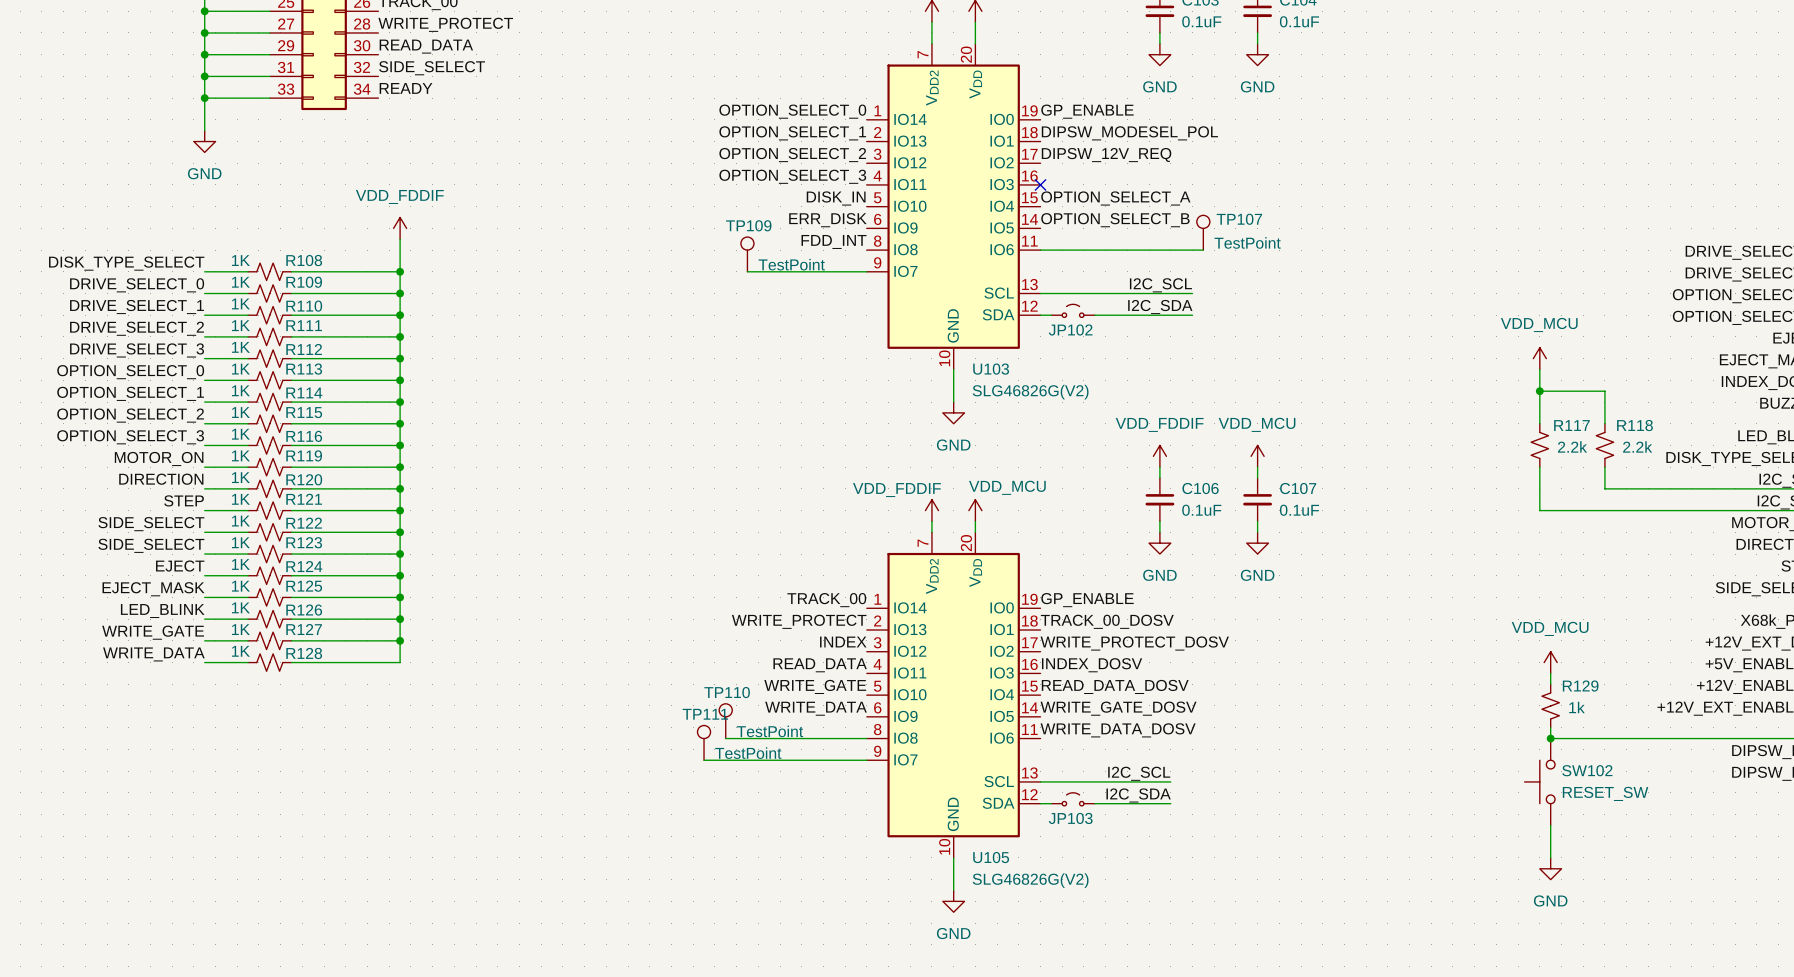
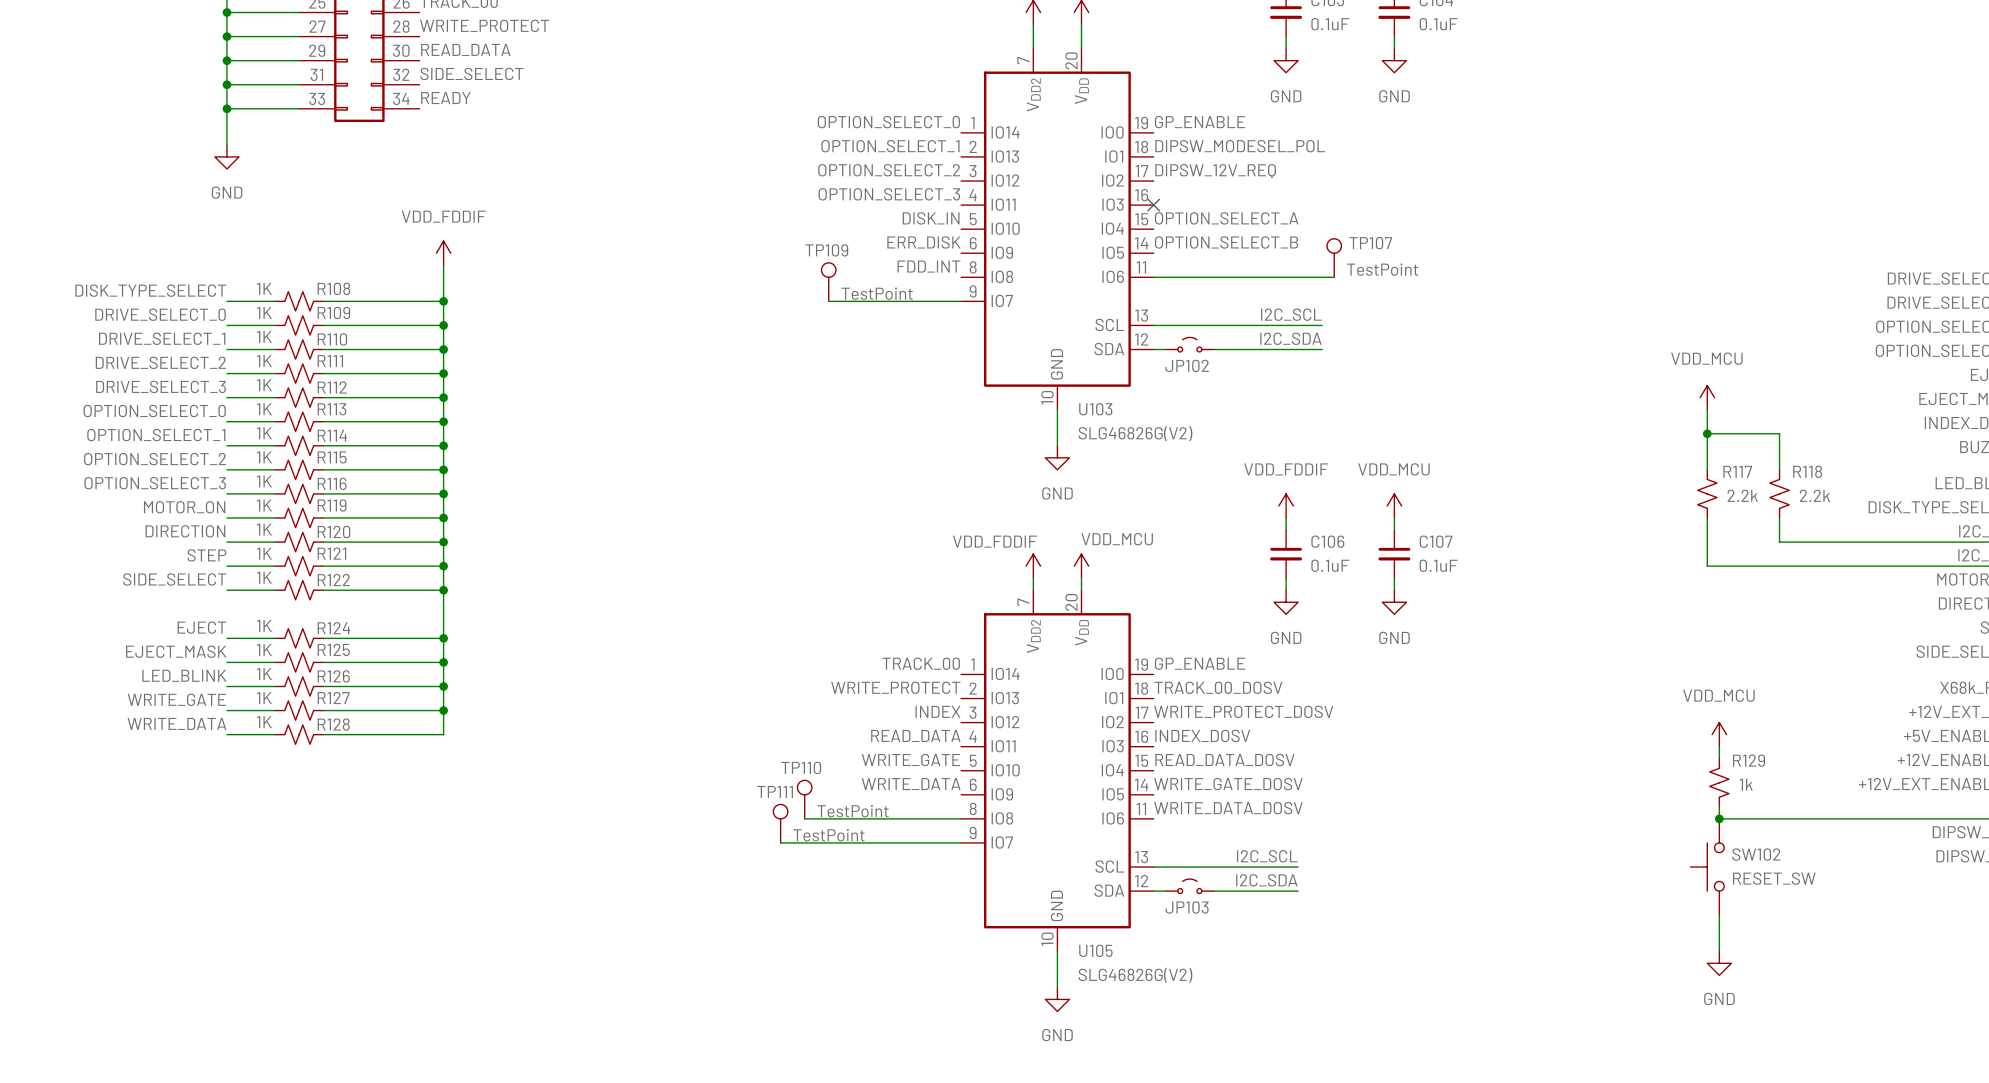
label: SIDE_SELECT (151, 545) -> none
wire: (204, 554) (248, 554) -> none
R123: 1K (269, 554) -> none
wire: (291, 554) (400, 554) -> none
junction: (400, 554) -> none

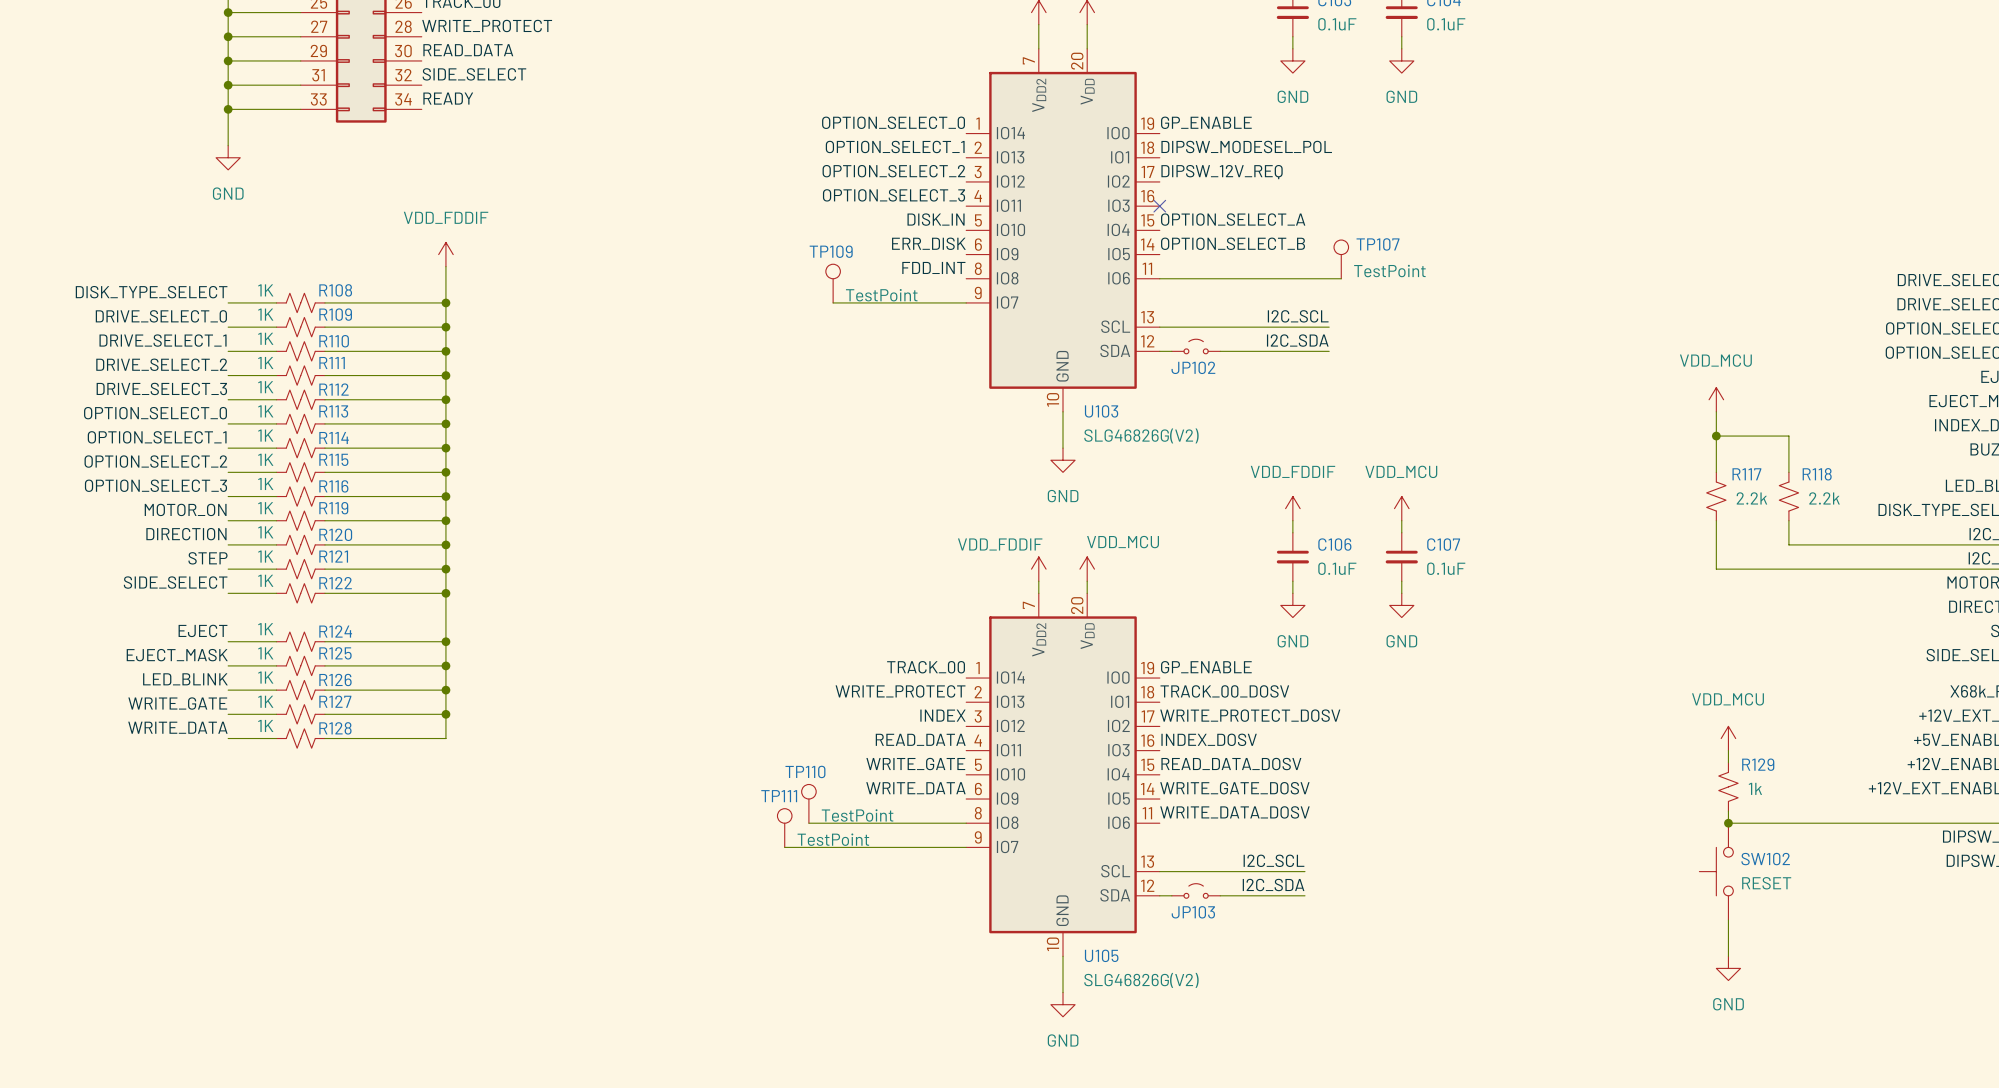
SW102 value: RESET_SW (1774, 878) -> RESET (1766, 883)

